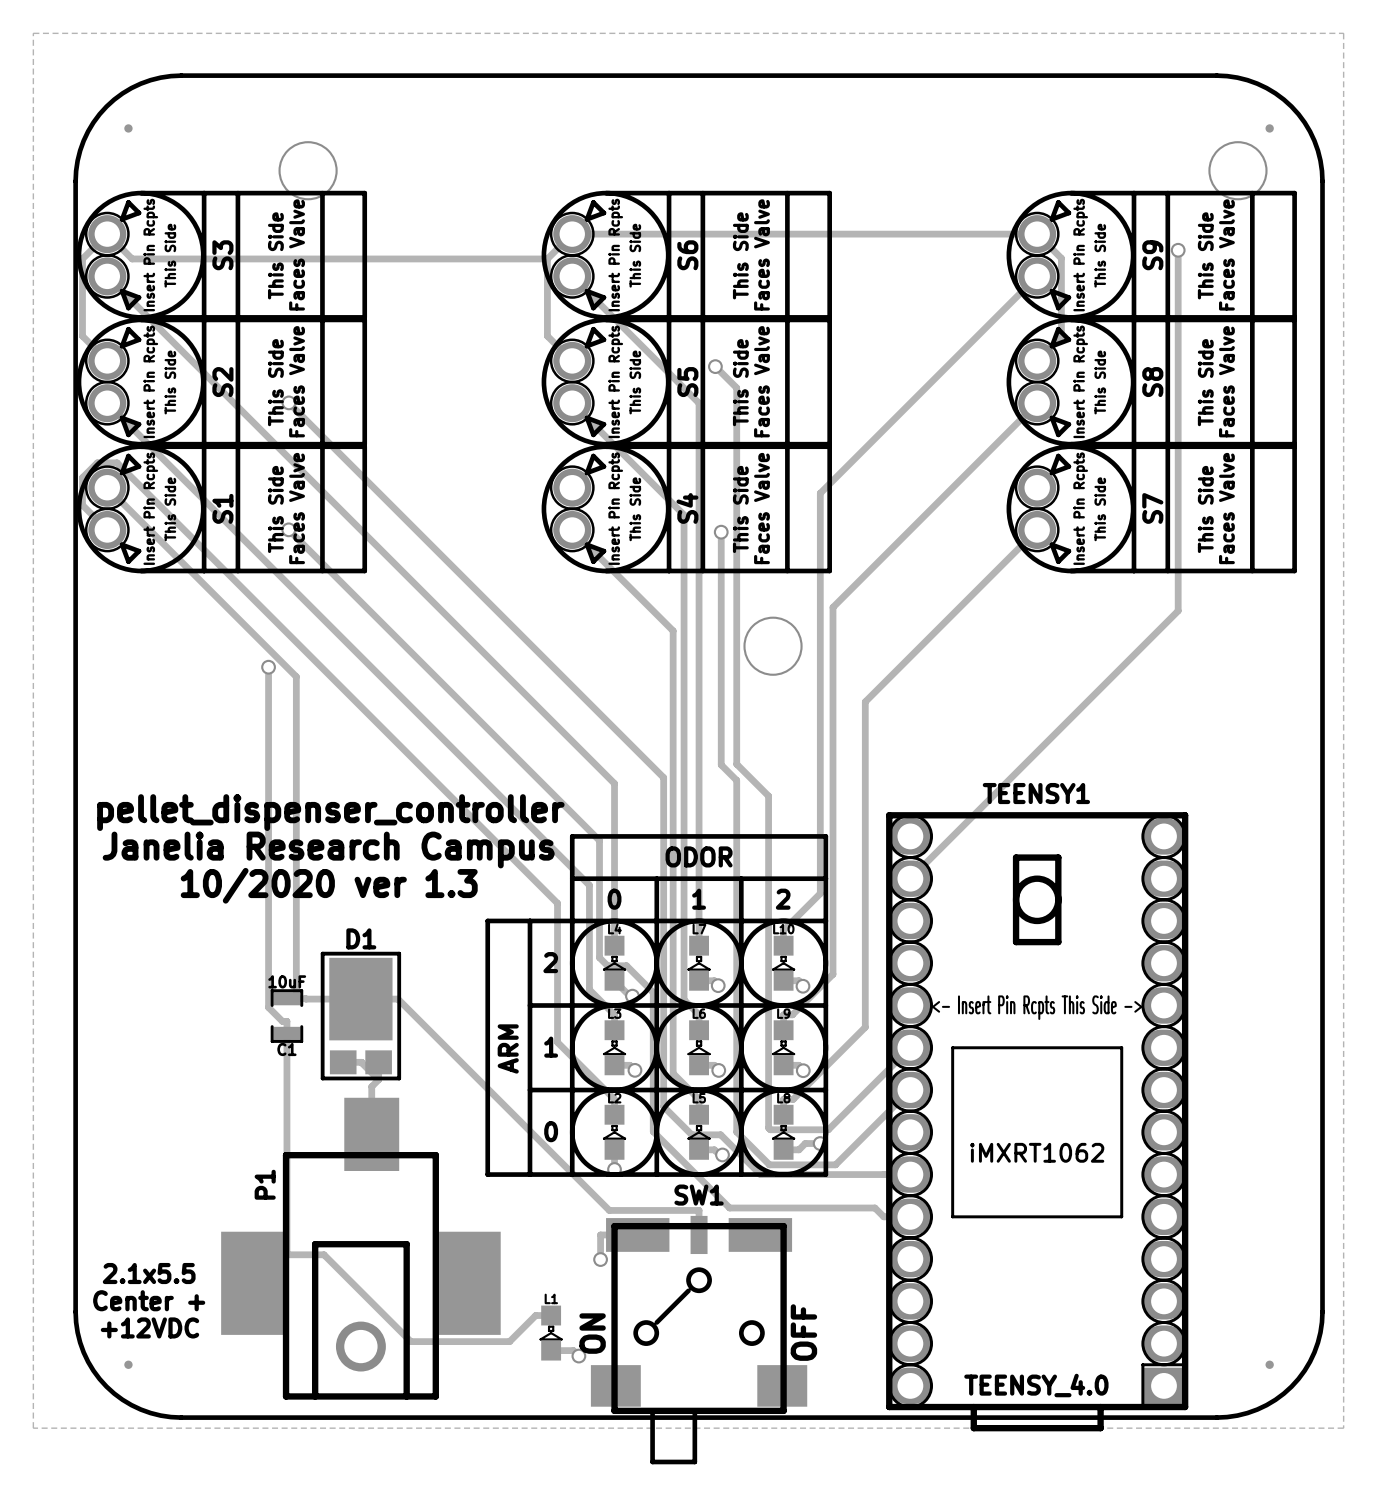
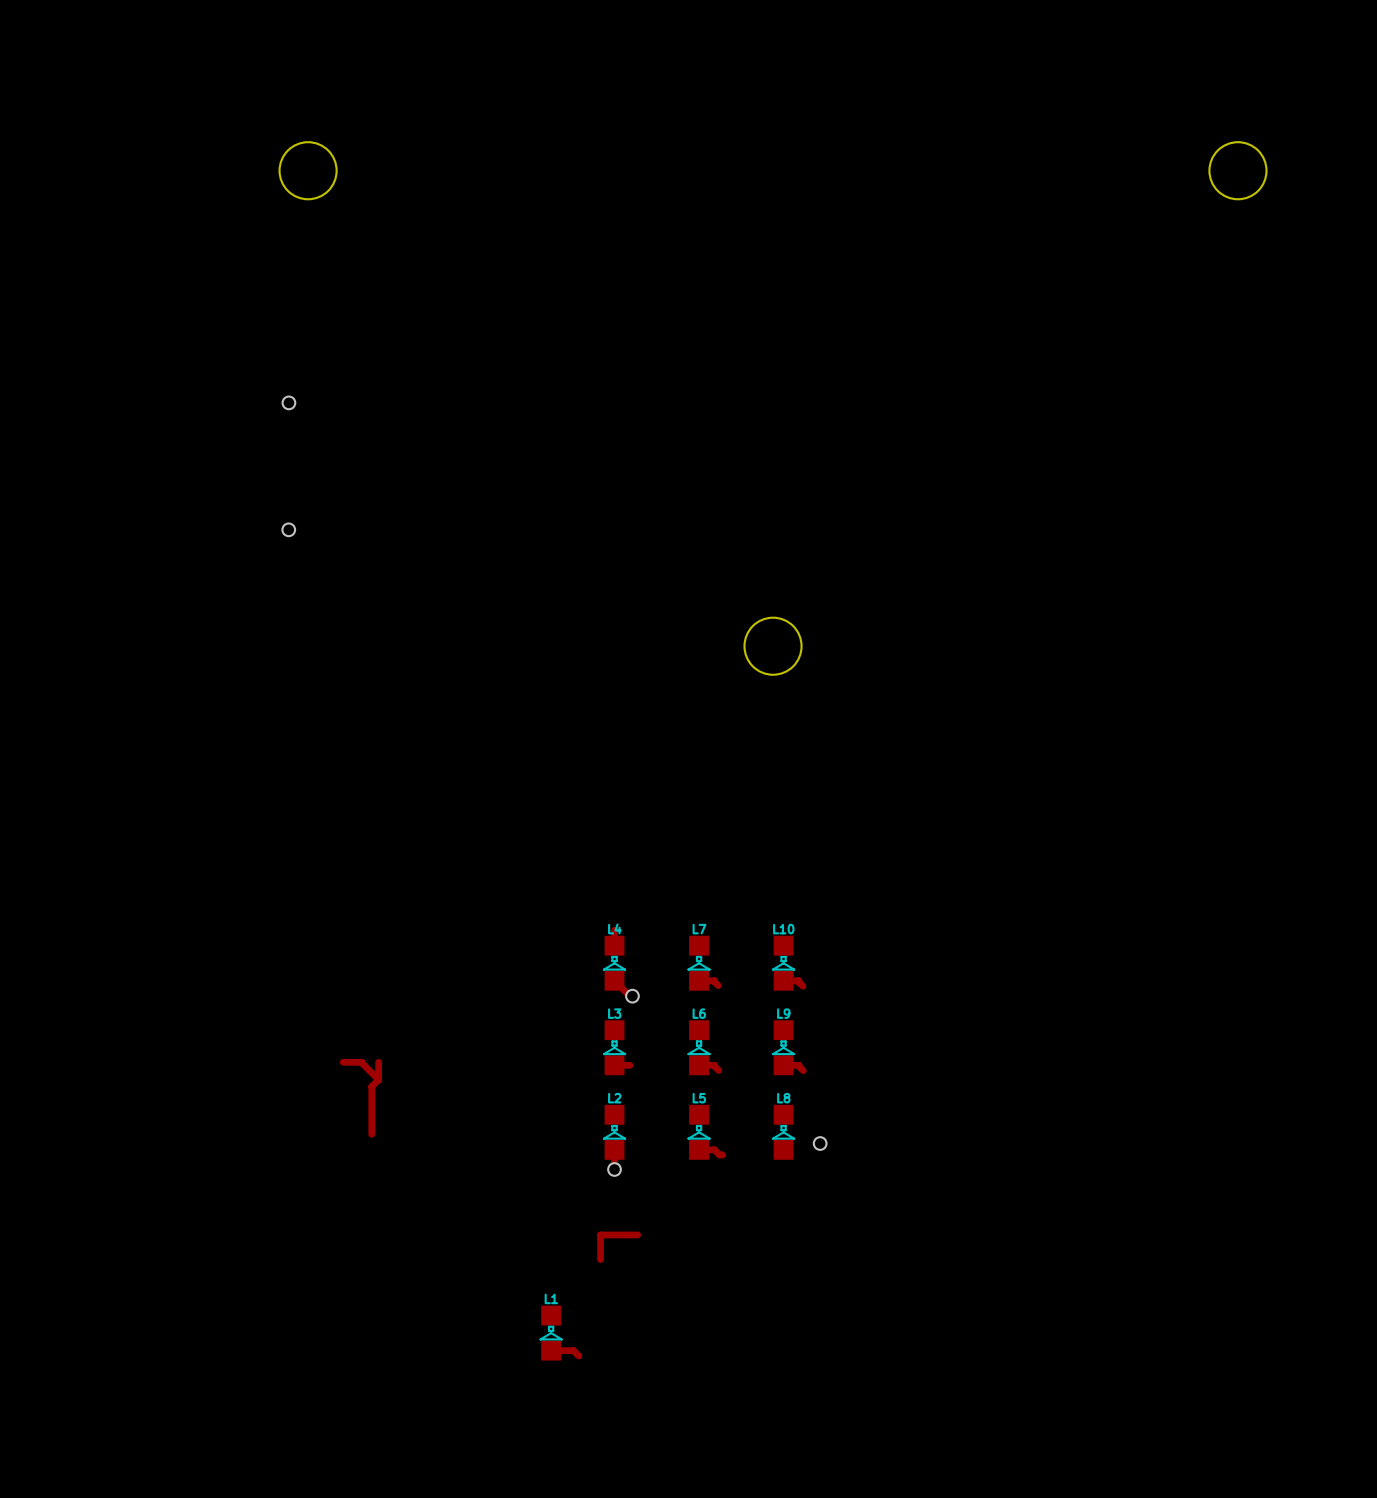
zone outline: (33, 33) (33, 1428) (1343, 1428) (1343, 33) (33, 33) -> none
board edge: (181, 75) (1216, 75) (1237, 77) (1266, 88) (1283, 99) (1298, 114) (1314, 140) (1320, 160) (1322, 181) (1322, 1311) (1317, 1342) (1310, 1361) (1298, 1378) (1283, 1393) (1266, 1405) (1247, 1413) (1216, 1417) (181, 1417) (160, 1415) (131, 1405) (114, 1393) (99, 1378) (83, 1352) (77, 1332) (75, 1311) (76, 170) (80, 150) (88, 131) (106, 106) (122, 93) (140, 83) (160, 77) (181, 75) -> none
part: (128, 128) -> none
part: (1269, 128) -> none
track: (1178, 250) (1178, 610) (910, 878) -> none
via: (1178, 250) -> none
S3: (221, 255) -> none
S6: (686, 255) -> none
S9: (1151, 255) -> none
track: (547, 258) (572, 234) (1037, 234) (1061, 258) (1061, 336) (1037, 360) -> none
track: (547, 258) (547, 336) (572, 360) -> none
track: (547, 258) (132, 258) (107, 234) (82, 258) (82, 336) (107, 360) -> none
track: (107, 276) (614, 783) (614, 930) -> none
track: (572, 276) (699, 403) (699, 945) -> none
track: (1037, 276) (820, 493) (820, 893) (783, 930) (783, 945) -> none
track: (715, 366) (736, 387) (736, 764) (768, 796) (768, 1127) (770, 1129) (828, 1129) (910, 1047) -> none
via: (715, 366) -> none
S2: (221, 382) -> none
S5: (686, 382) -> none
S8: (1151, 382) -> none
track: (288, 402) (663, 777) (663, 1106) (691, 1134) (720, 1134) (760, 1174) (910, 1174) -> none
track: (107, 403) (589, 885) (589, 989) (614, 1014) (614, 1030) -> none
track: (572, 403) (684, 514) (684, 999) (699, 1014) (699, 1030) -> none
track: (1037, 403) (832, 607) (832, 974) (792, 1014) (783, 1014) (783, 1030) -> none
track: (107, 487) (296, 676) (296, 998) -> none
S1: (221, 508) -> none
S4: (686, 508) -> none
S7: (1151, 508) -> none
track: (107, 529) (82, 505) (82, 477) (97, 462) (117, 462) (557, 903) (557, 1042) (614, 1099) (614, 1114) -> none
track: (288, 529) (599, 840) (599, 957) (607, 965) (626, 965) (653, 992) (653, 1131) (729, 1208) (874, 1208) (883, 1216) (910, 1216) -> none
track: (572, 529) (673, 630) (673, 1073) (699, 1099) (699, 1114) -> none
track: (1037, 529) (865, 701) (865, 1027) (793, 1099) (783, 1099) (783, 1114) -> none
track: (721, 532) (721, 764) (736, 780) (736, 1132) (769, 1164) (835, 1164) (910, 1090) -> none
via: (721, 532) -> none
track: (268, 667) (268, 1007) (282, 1021) (286, 1021) (286, 1254) -> none
via: (268, 667) -> none
text: pellet_dispenser_controller (330, 812) -> none
text: Janelia Research Campus (328, 850) -> none
text: ODOR (699, 856) -> none
line: (572, 878) (825, 878) -> none
line: (656, 878) (656, 1174) -> none
line: (741, 878) (741, 1174) -> none
text: 10/2020 ver 1.3 (329, 885) -> none
text: 0 (614, 899) -> none
text: 1 (699, 899) -> none
text: 2 (783, 899) -> none
drawing: [569, 918, 829, 1177] -> none
line: (529, 920) (529, 1174) -> none
line: (825, 920) (487, 920) (487, 1174) (825, 1174) (825, 836) (572, 836) (572, 1174) -> none
text: 2 (550, 962) -> none
via: (718, 985) -> none
via: (802, 986) -> none
track: (286, 998) (398, 999) (609, 1210) (699, 1210) (699, 1234) -> none
line: (529, 1005) (825, 1005) -> none
C1: 10uF (286, 1016) -> none
D1: (360, 1016) -> none
text: 1 (551, 1047) -> none
text: ARM (508, 1048) -> none
via: (634, 1070) -> none
via: (718, 1070) -> none
via: (803, 1070) -> none
line: (529, 1090) (825, 1090) -> none
TEENSY1: TEENSY_4.0 (1037, 1121) -> none
text: 0 (551, 1131) -> none
track: (820, 1143) (805, 1143) (798, 1149) (783, 1149) -> none
via: (722, 1154) -> none
P1: (360, 1248) -> none
via: (600, 1259) -> none
text: 2.1x5.5 (149, 1273) -> none
track: (253, 1283) (253, 1254) (324, 1254) (410, 1341) (509, 1341) (535, 1315) (551, 1315) -> none
text: Center + (149, 1300) -> none
text: +12VDC (149, 1327) -> none
SW1: (699, 1340) -> none
via: (578, 1356) -> none
part: (128, 1364) -> none
part: (1269, 1364) -> none

